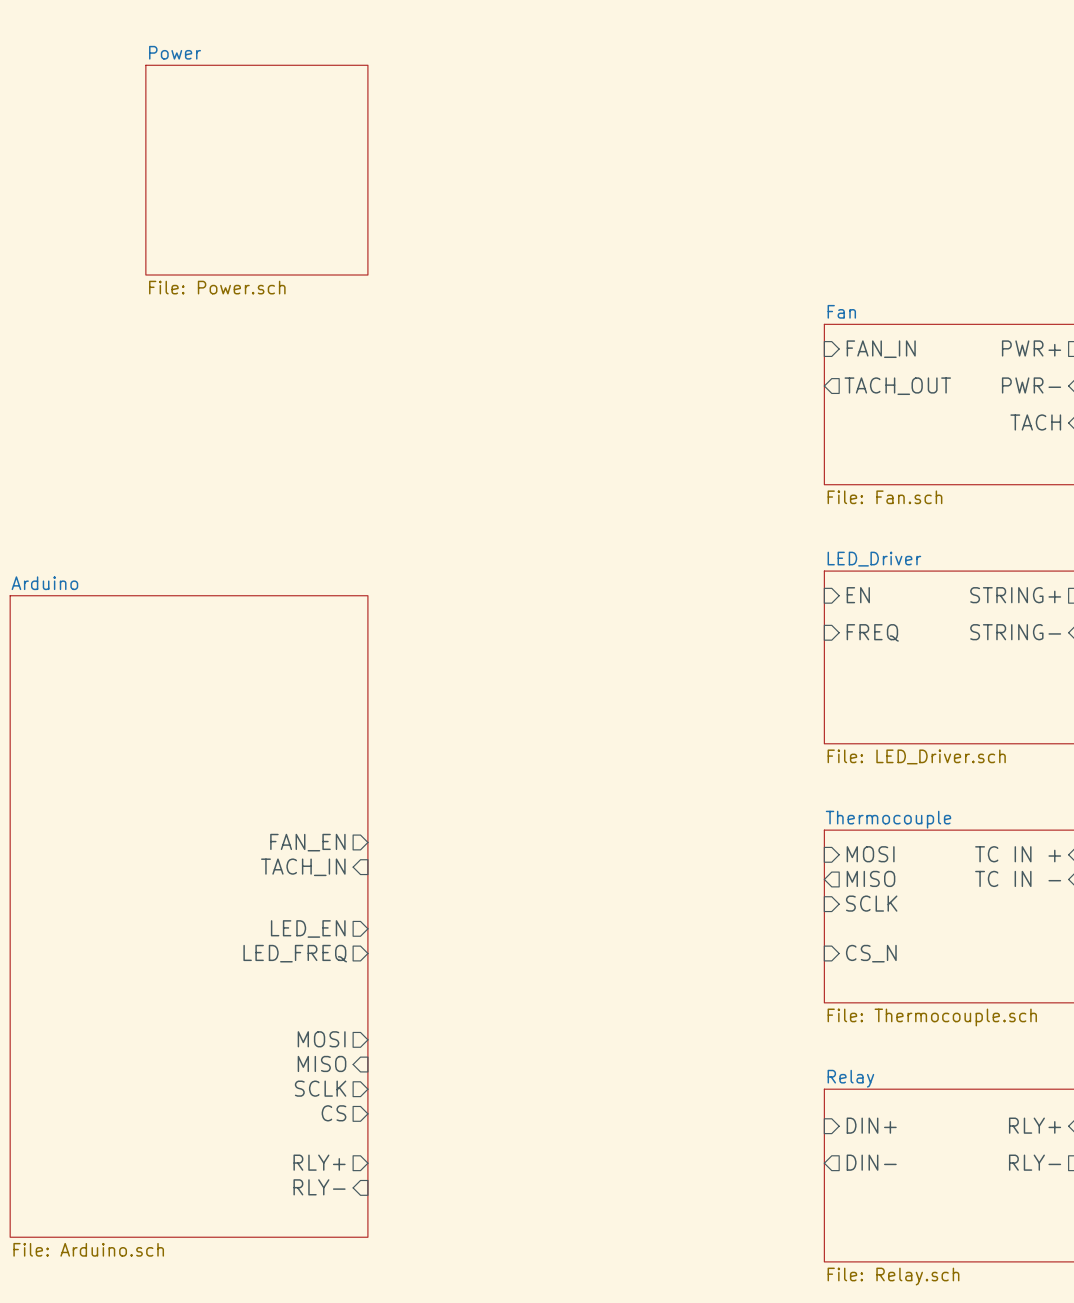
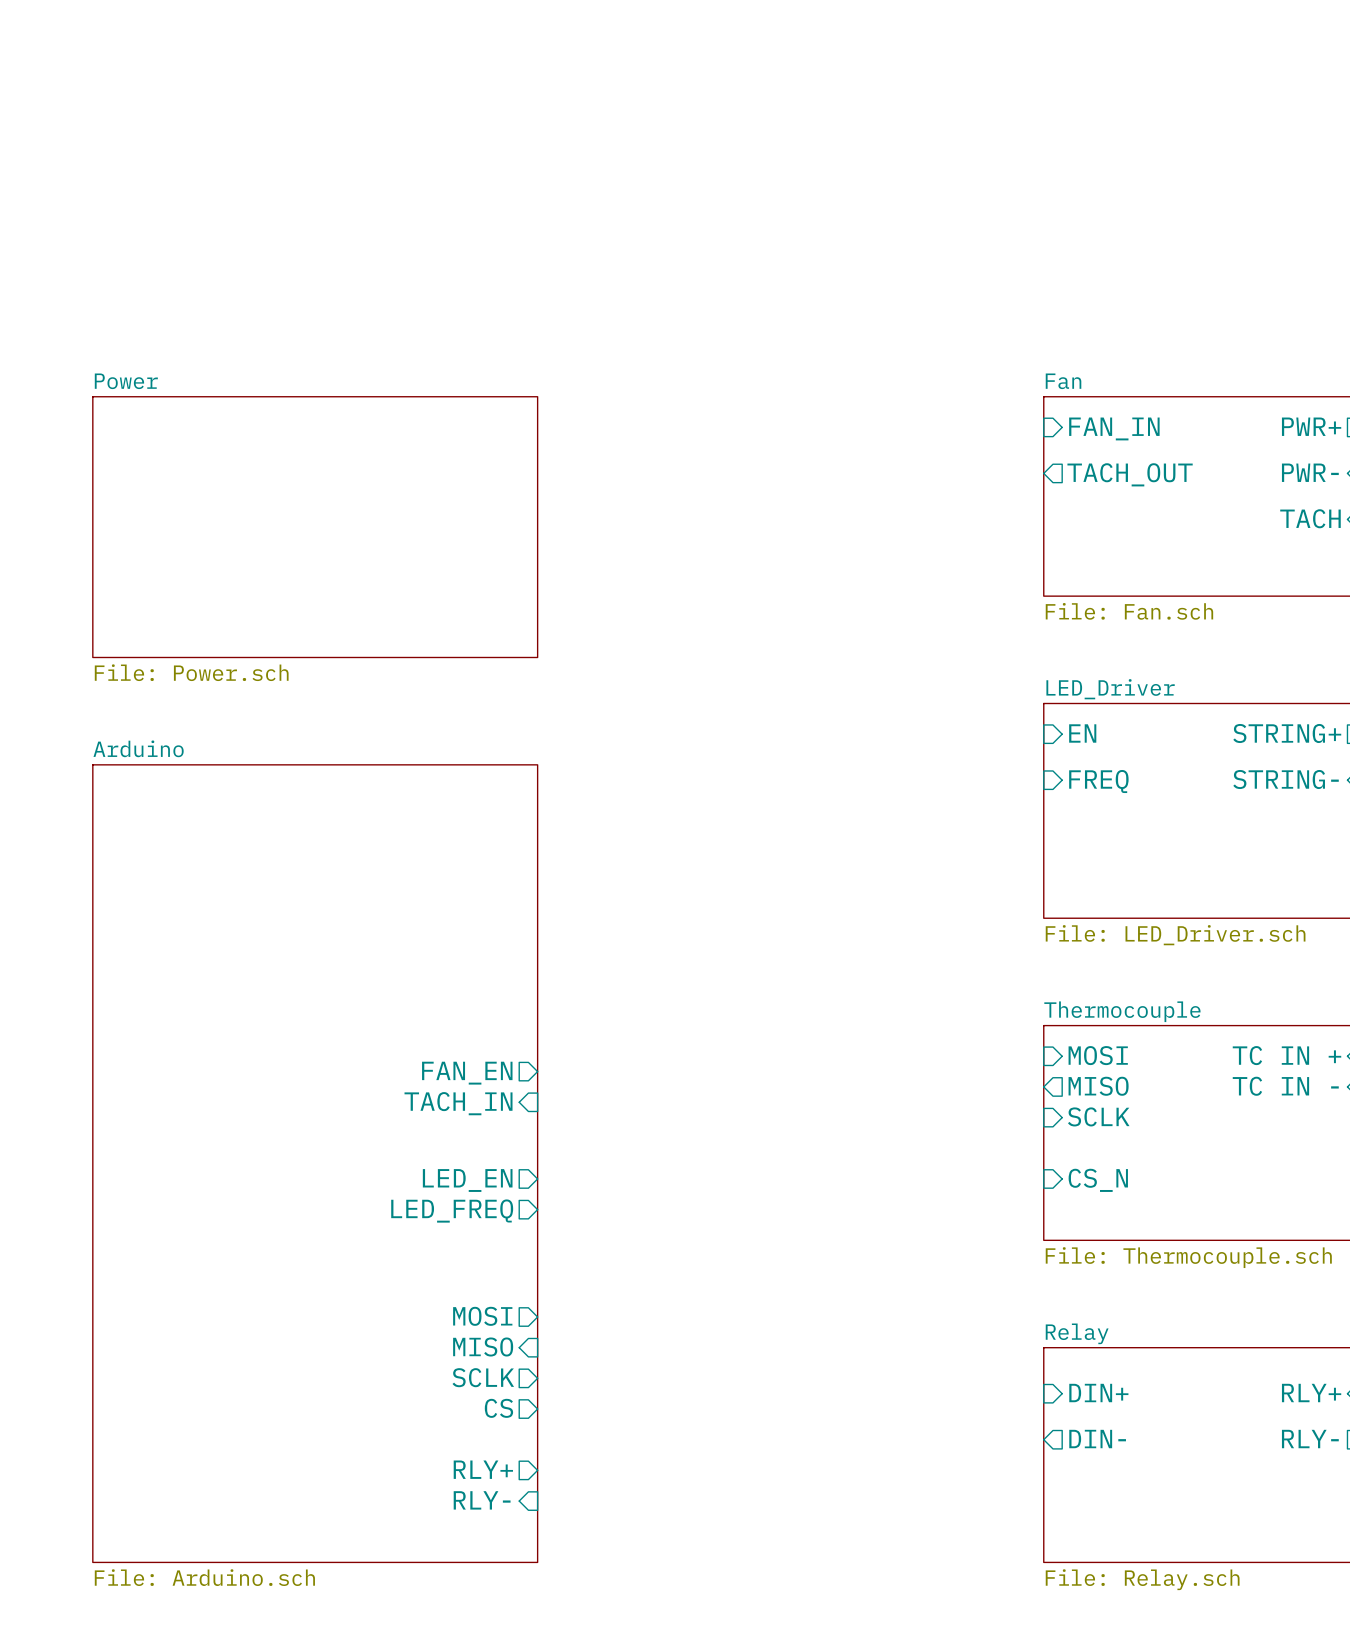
sheet Power: File: Power.sch (256, 170) -> none
sheet Power: none -> File: Power.sch (315, 527)
sheet pin position: FAN_EN (307, 842) -> FAN_EN (467, 1073)
sheet pin position: TACH_IN (303, 867) -> TACH_IN (458, 1103)
sheet Arduino position: (189, 916) -> (315, 1163)
sheet pin position: LED_EN (308, 928) -> LED_EN (467, 1180)
sheet pin position: LED_FREQ (295, 953) -> LED_FREQ (452, 1211)
sheet pin position: MOSI (321, 1039) -> MOSI (482, 1316)
sheet pin position: MISO (322, 1063) -> MISO (483, 1347)
sheet pin position: SCLK (320, 1088) -> SCLK (483, 1377)
sheet pin position: CS (333, 1113) -> CS (498, 1408)
sheet pin position: RLY+ (319, 1162) -> RLY+ (483, 1469)
sheet pin position: RLY- (319, 1187) -> RLY- (482, 1500)

